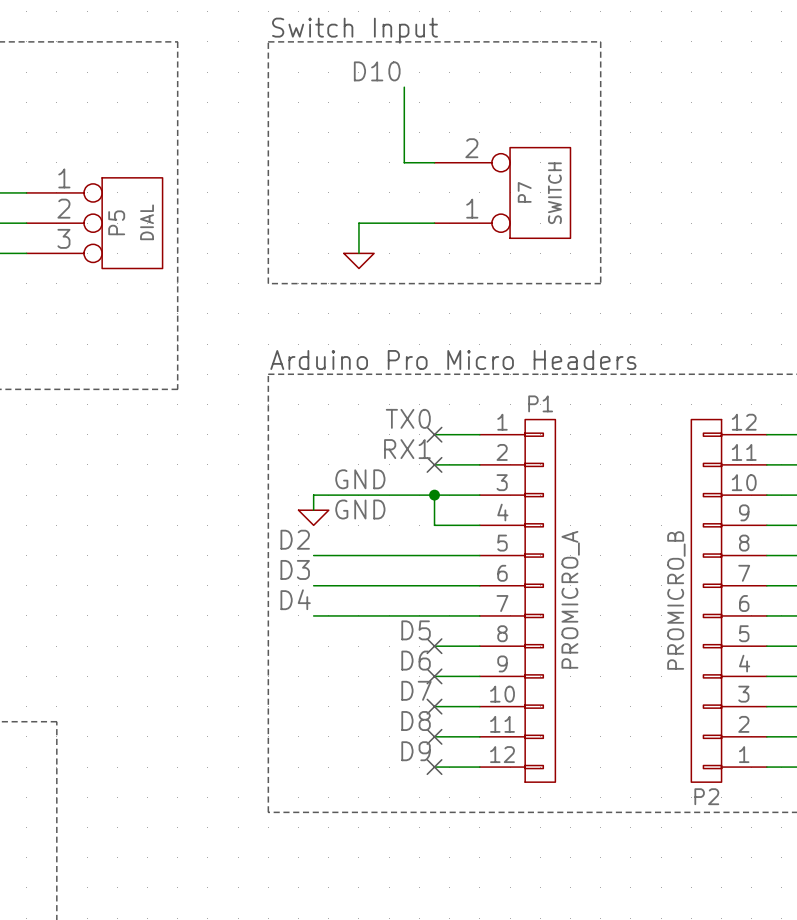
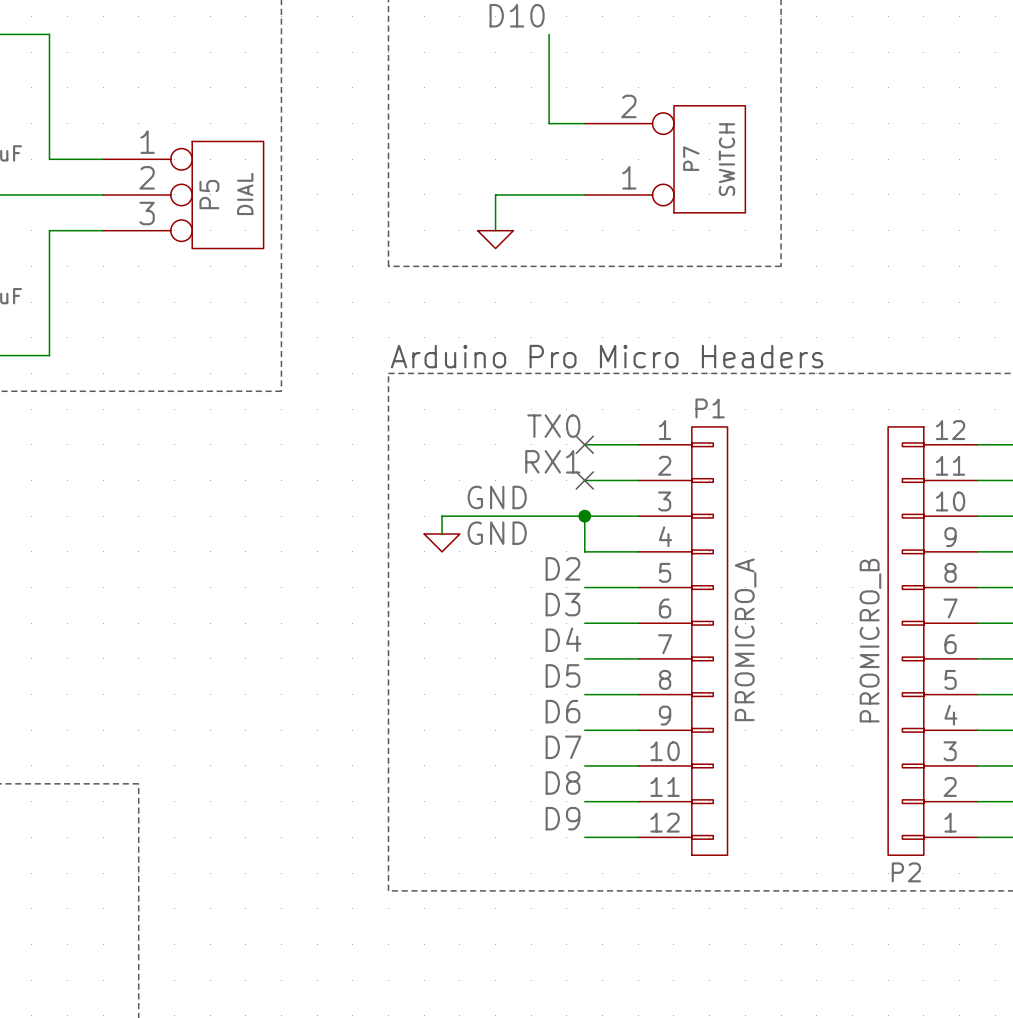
label position: D2 (295, 539) -> D2 (562, 568)
wire: (313, 555) (434, 555) -> none
label position: D3 (295, 569) -> D3 (562, 604)
wire: (313, 585) (434, 585) -> none
label position: D4 (295, 599) -> D4 (563, 639)
wire: (313, 615) (434, 615) -> none
no-connect mark: (434, 646) -> none
no-connect mark: (434, 676) -> none
no-connect mark: (434, 706) -> none
no-connect mark: (434, 736) -> none
no-connect mark: (434, 767) -> none

